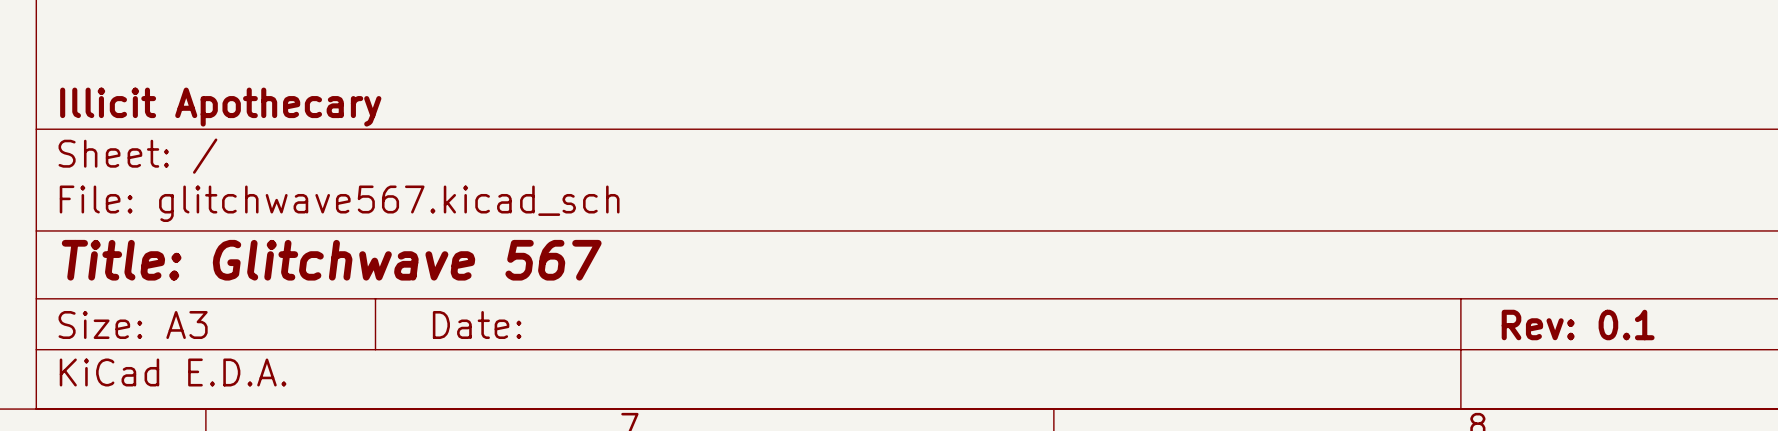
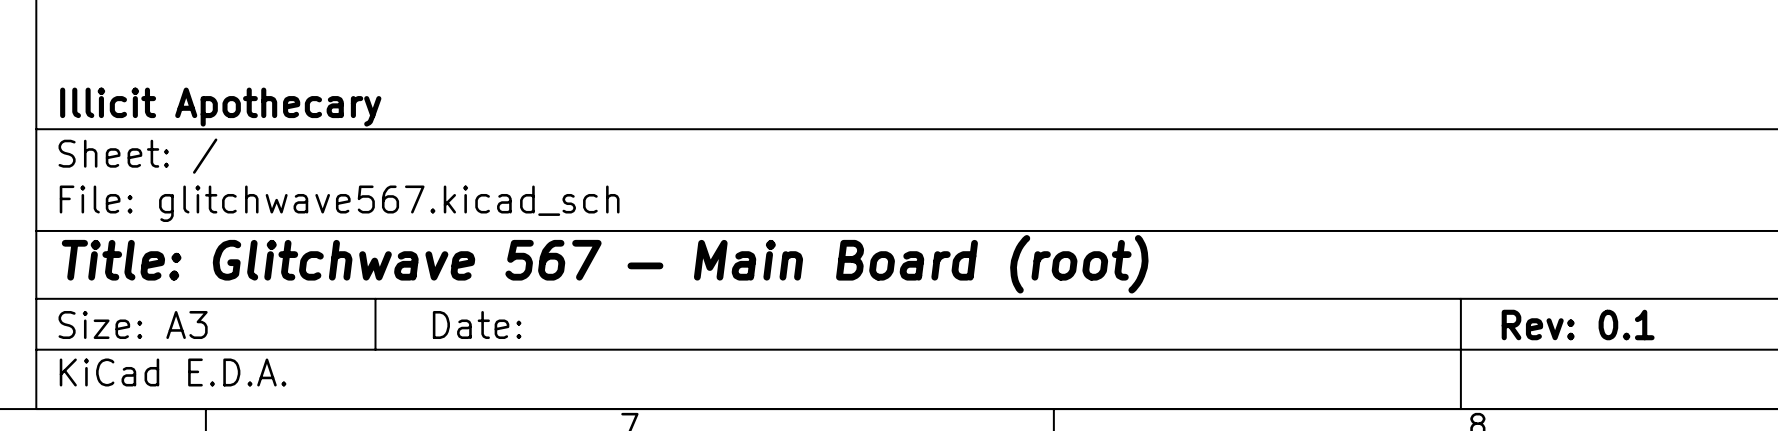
title block: Title: Glitchwave 567 (331, 260) -> Title: Glitchwave 567 — Main Board (root) (605, 264)

